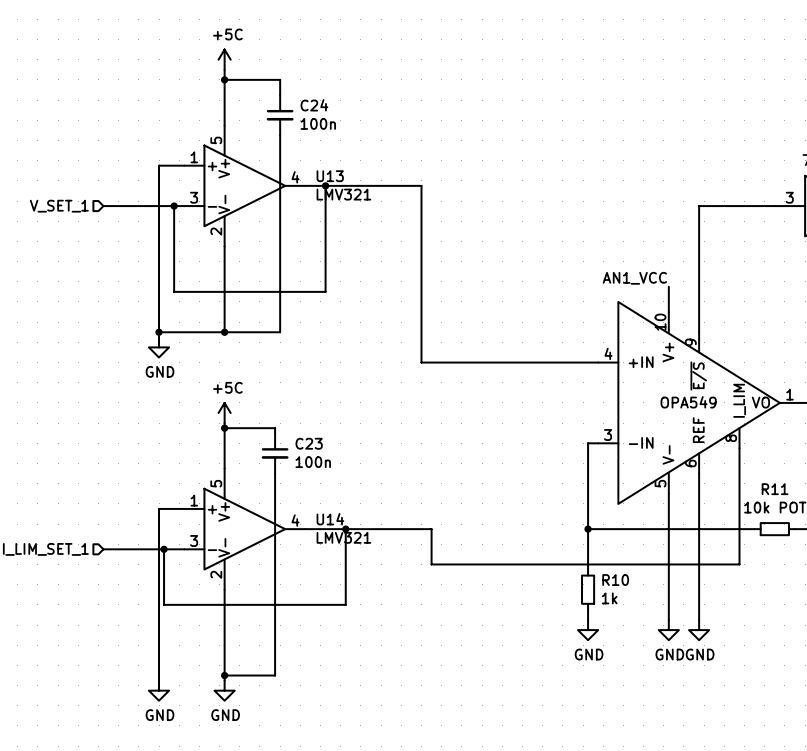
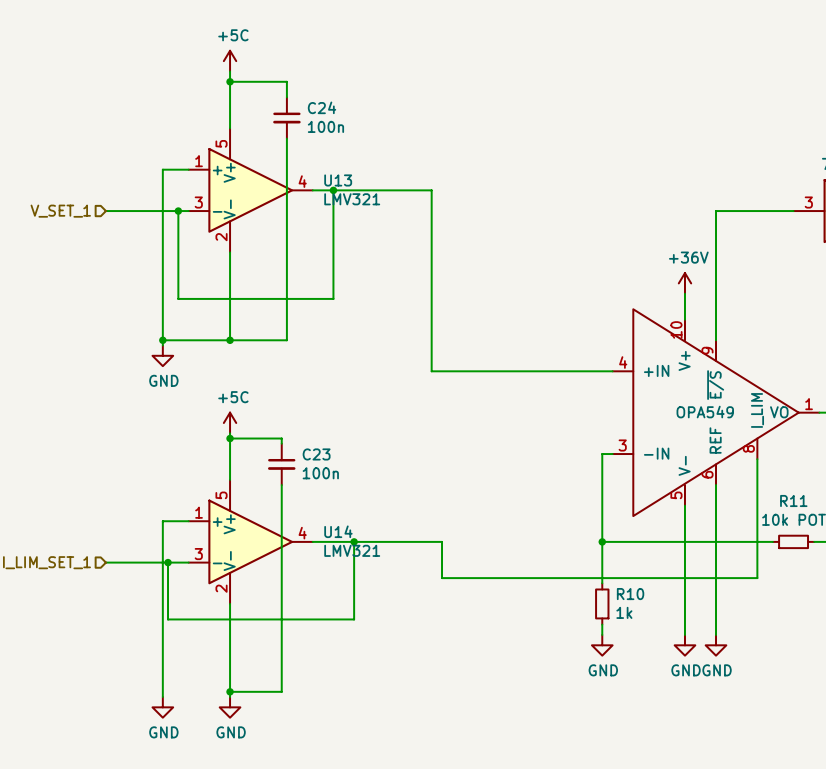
power symbol: none -> +36V (684, 283)
label: AN1_VCC (634, 278) -> none

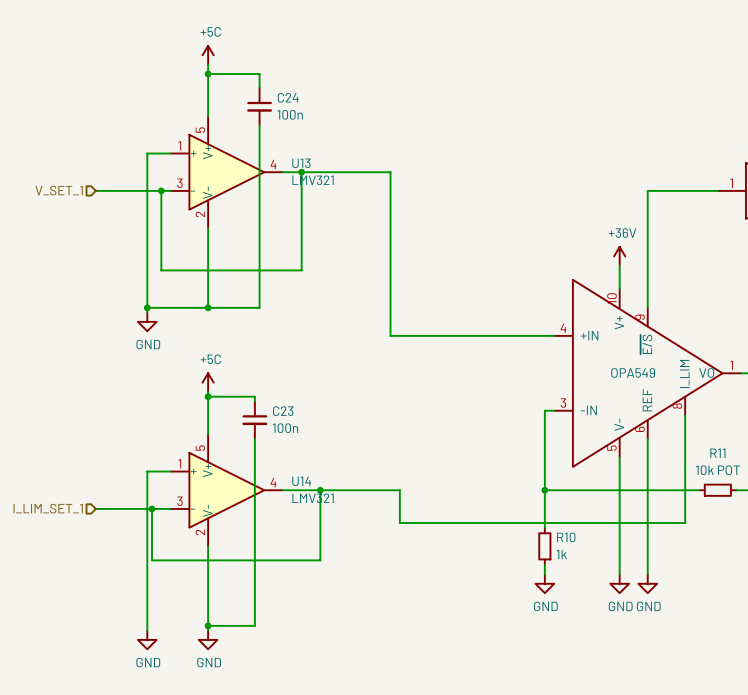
part pin number: 3 (808, 202) -> 1 (731, 183)

